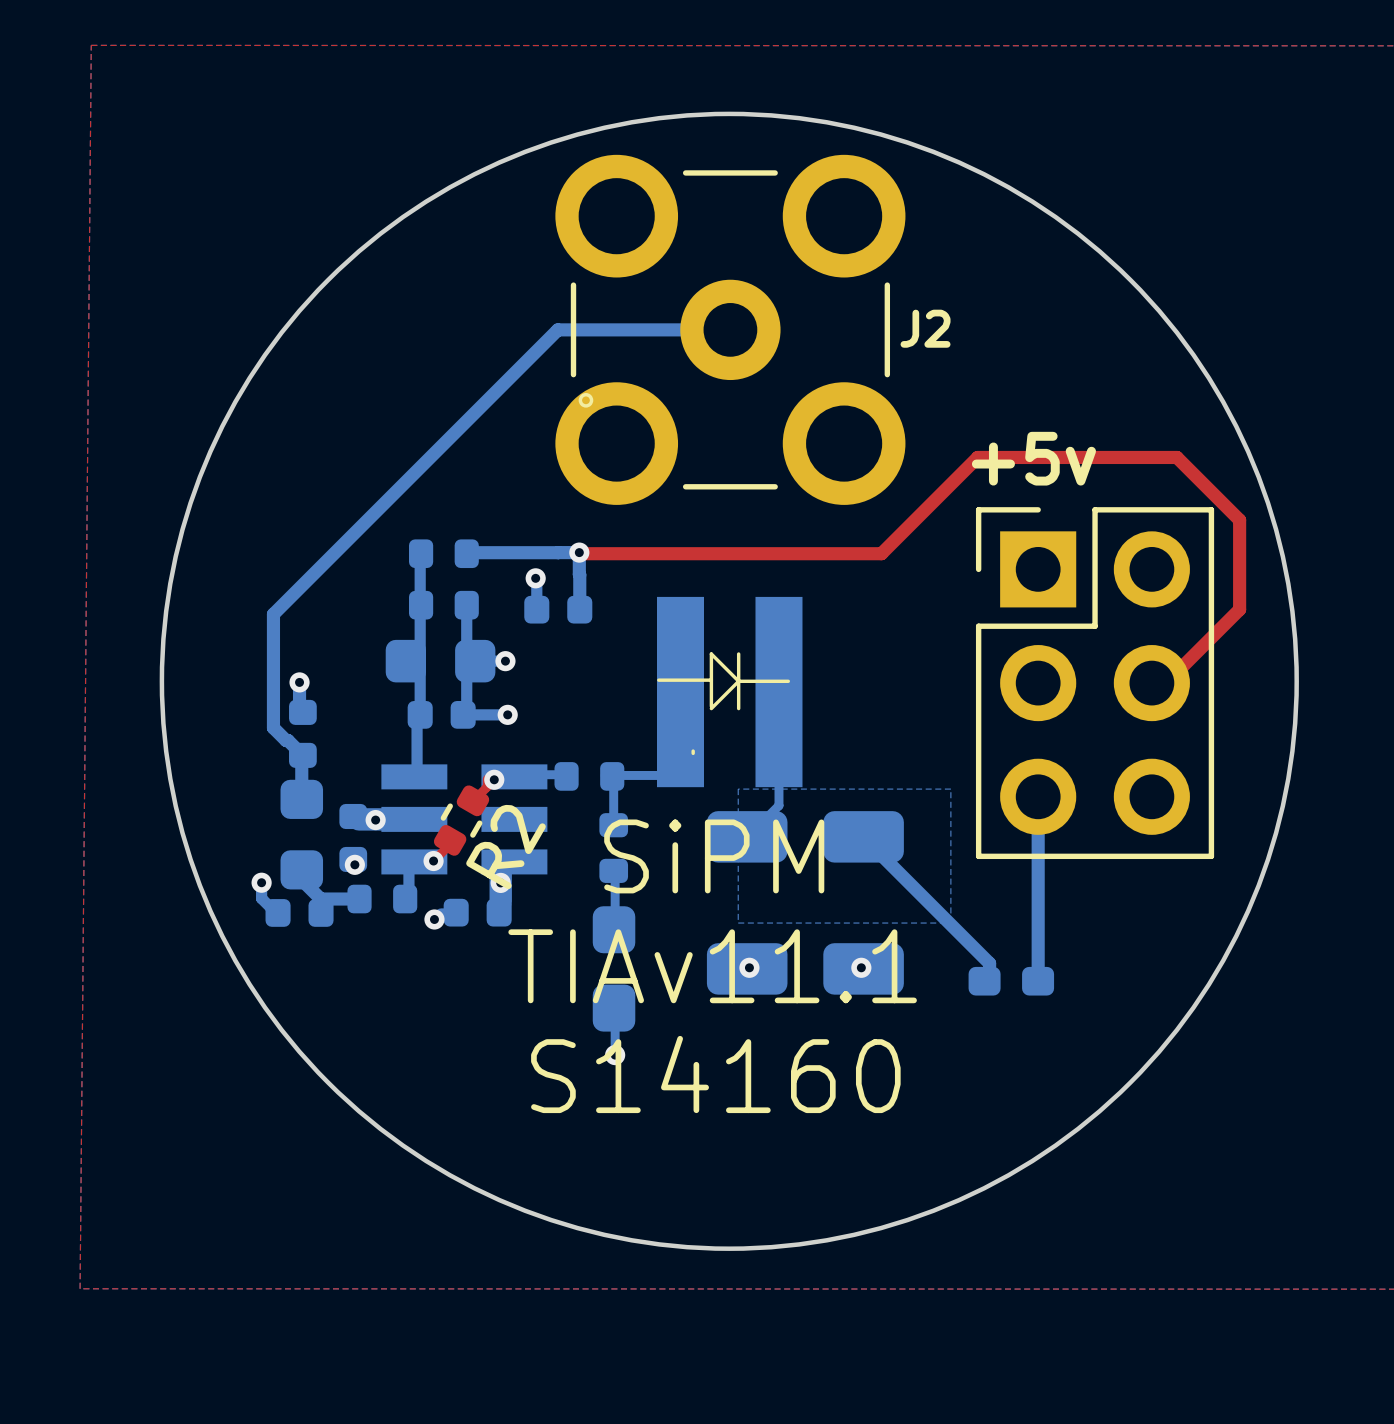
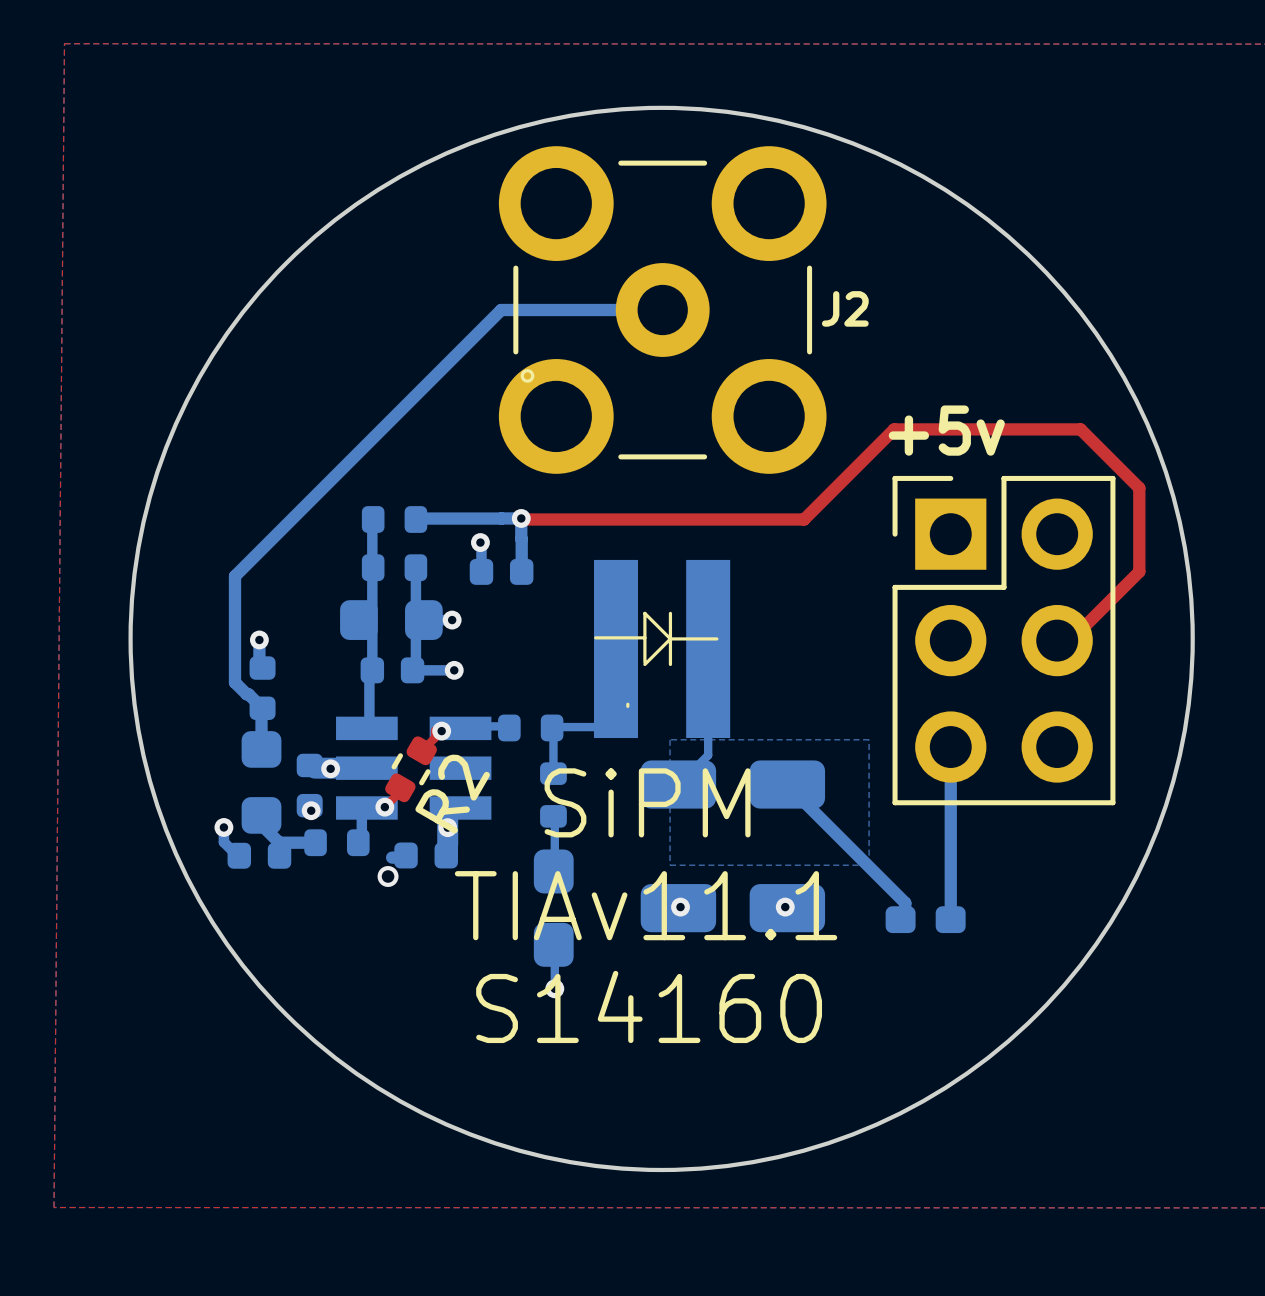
via position: (434, 919) -> (388, 876)

